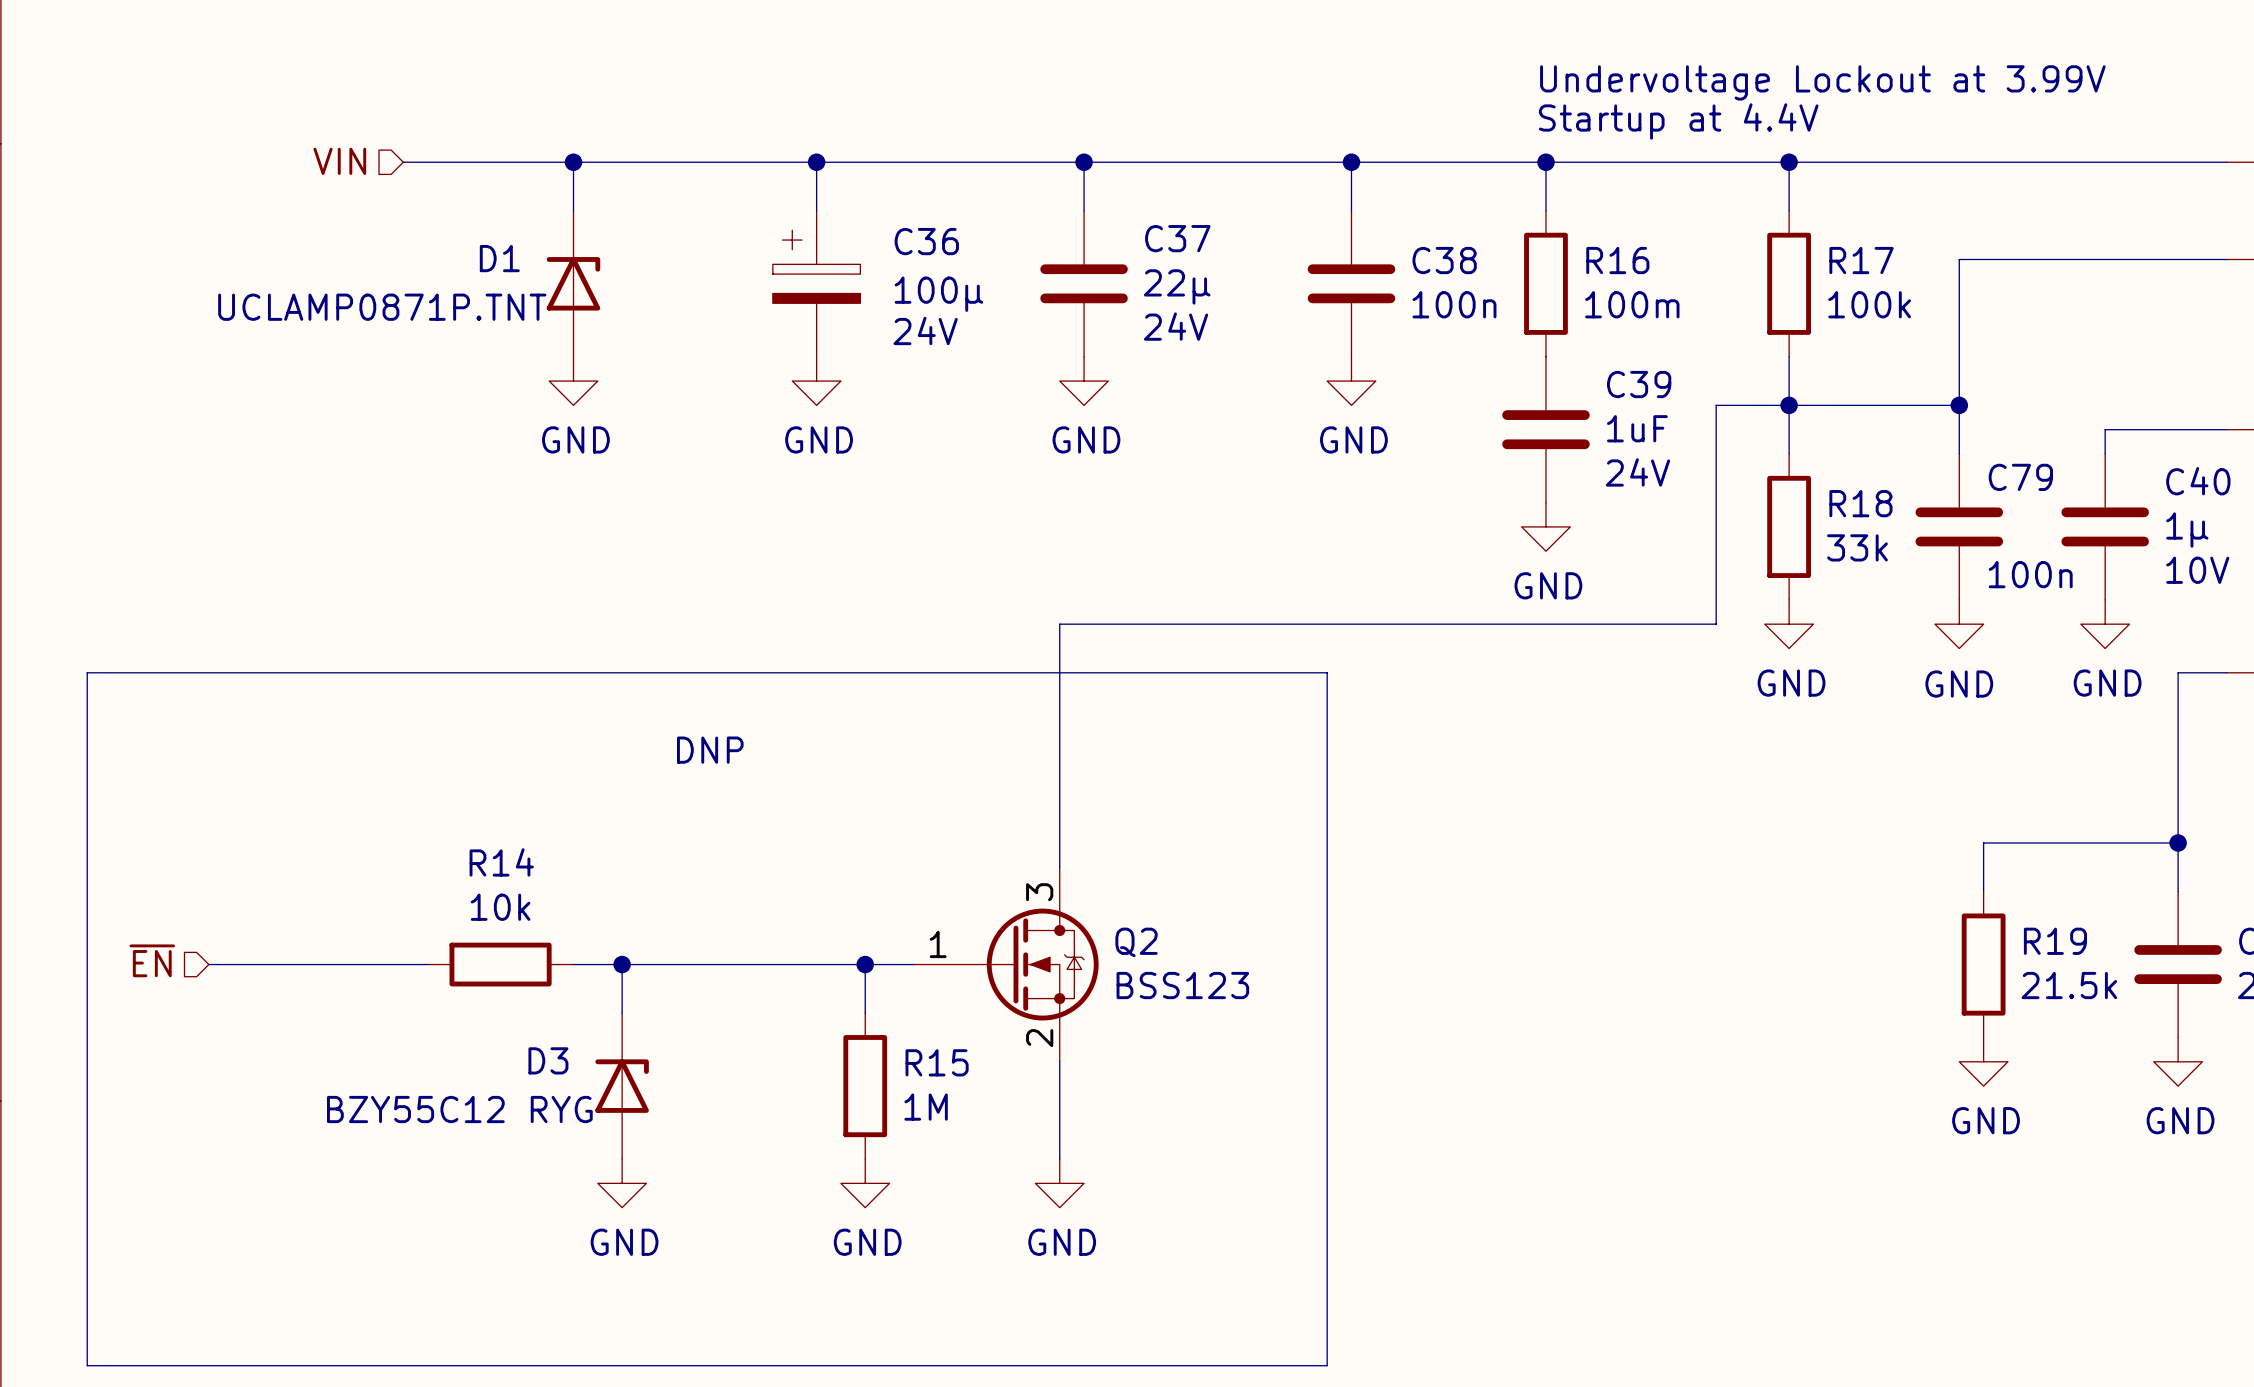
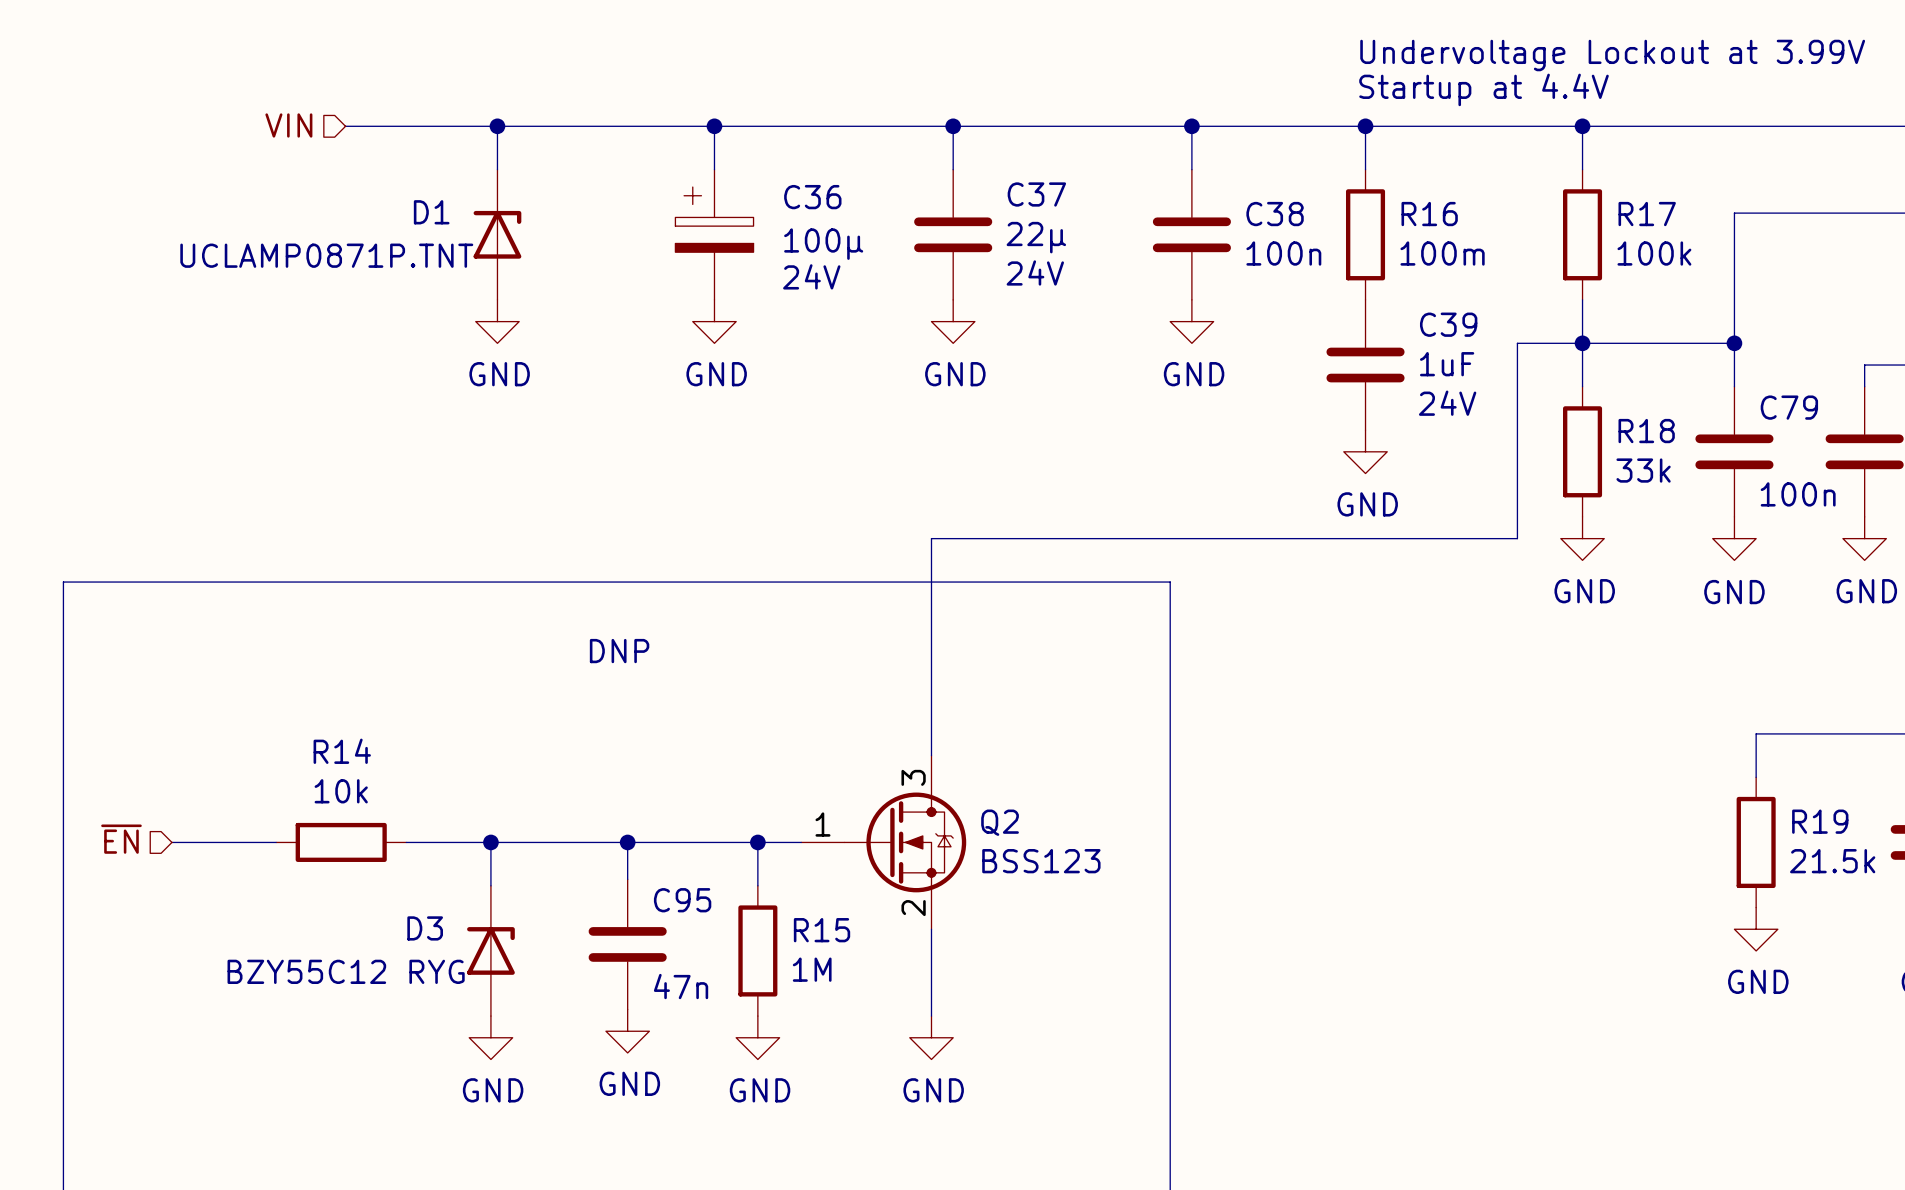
wire: (325, 964) (427, 964) -> (406, 842) (497, 842)
R14 position: (500, 964) -> (341, 842)
junction: none -> (490, 842)
wire: (622, 964) (622, 1013) -> (490, 842) (490, 885)
junction: (622, 964) -> none
wire: none -> (627, 842) (627, 879)
junction: none -> (627, 842)
C95: none -> 47n (627, 944)
D3 position: (622, 1086) -> (490, 950)
power symbol: none -> GND (627, 1031)
power symbol: none -> GND (490, 1037)
power symbol: GND (622, 1183) -> none

